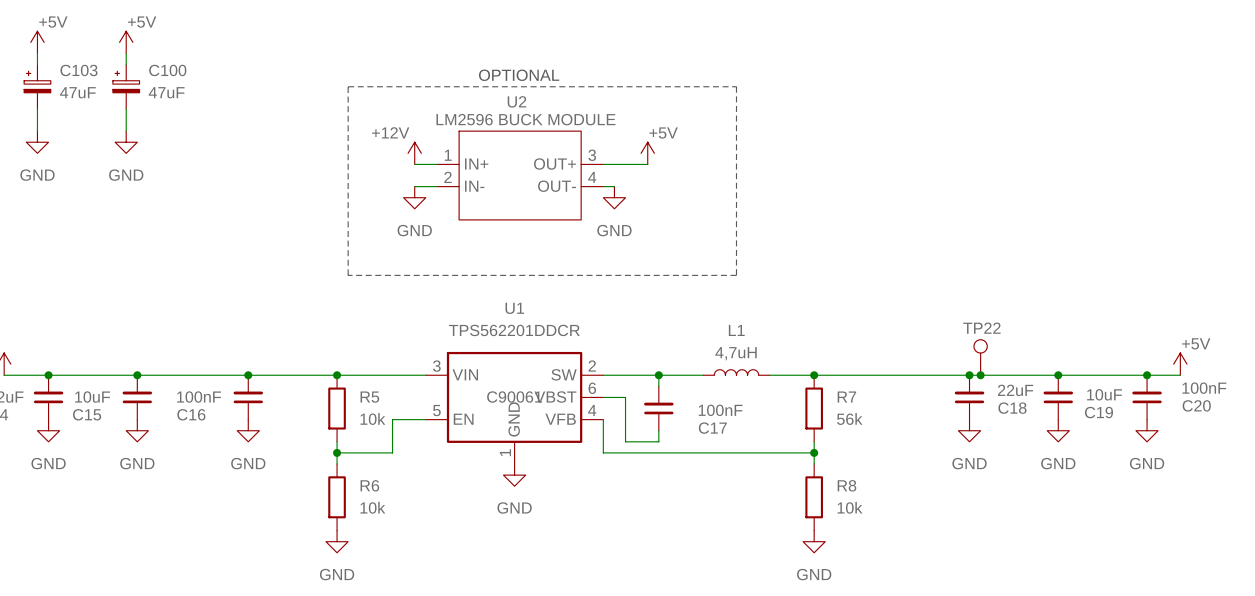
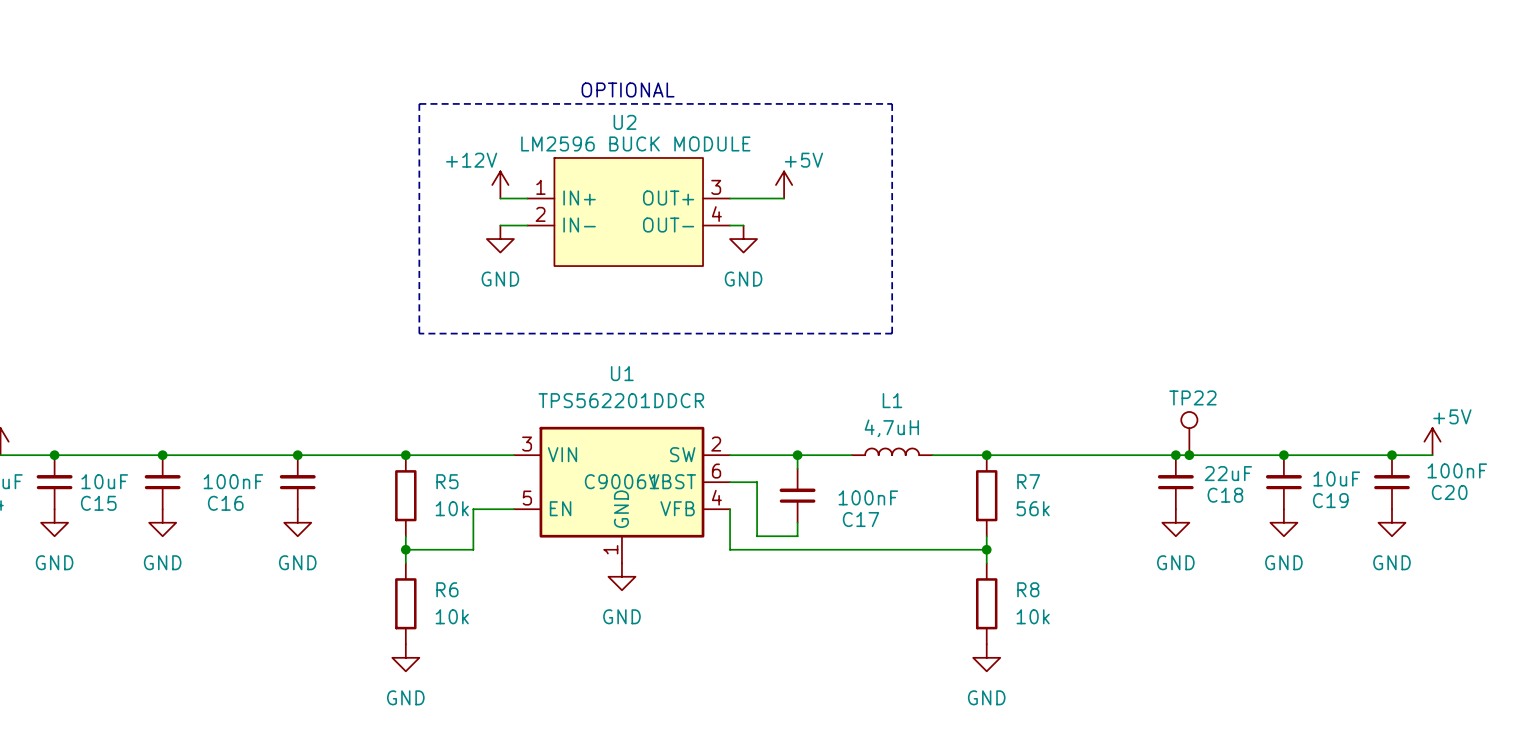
power symbol: +5V (37, 42) -> none
power symbol: +5V (126, 42) -> none
wire: (37, 53) (37, 64) -> none
wire: (126, 53) (126, 64) -> none
C103: 47uF (37, 86) -> none
C100: 47uF (126, 86) -> none
wire: (37, 108) (37, 131) -> none
wire: (126, 108) (126, 131) -> none
power symbol: GND (37, 142) -> none
power symbol: GND (126, 142) -> none

